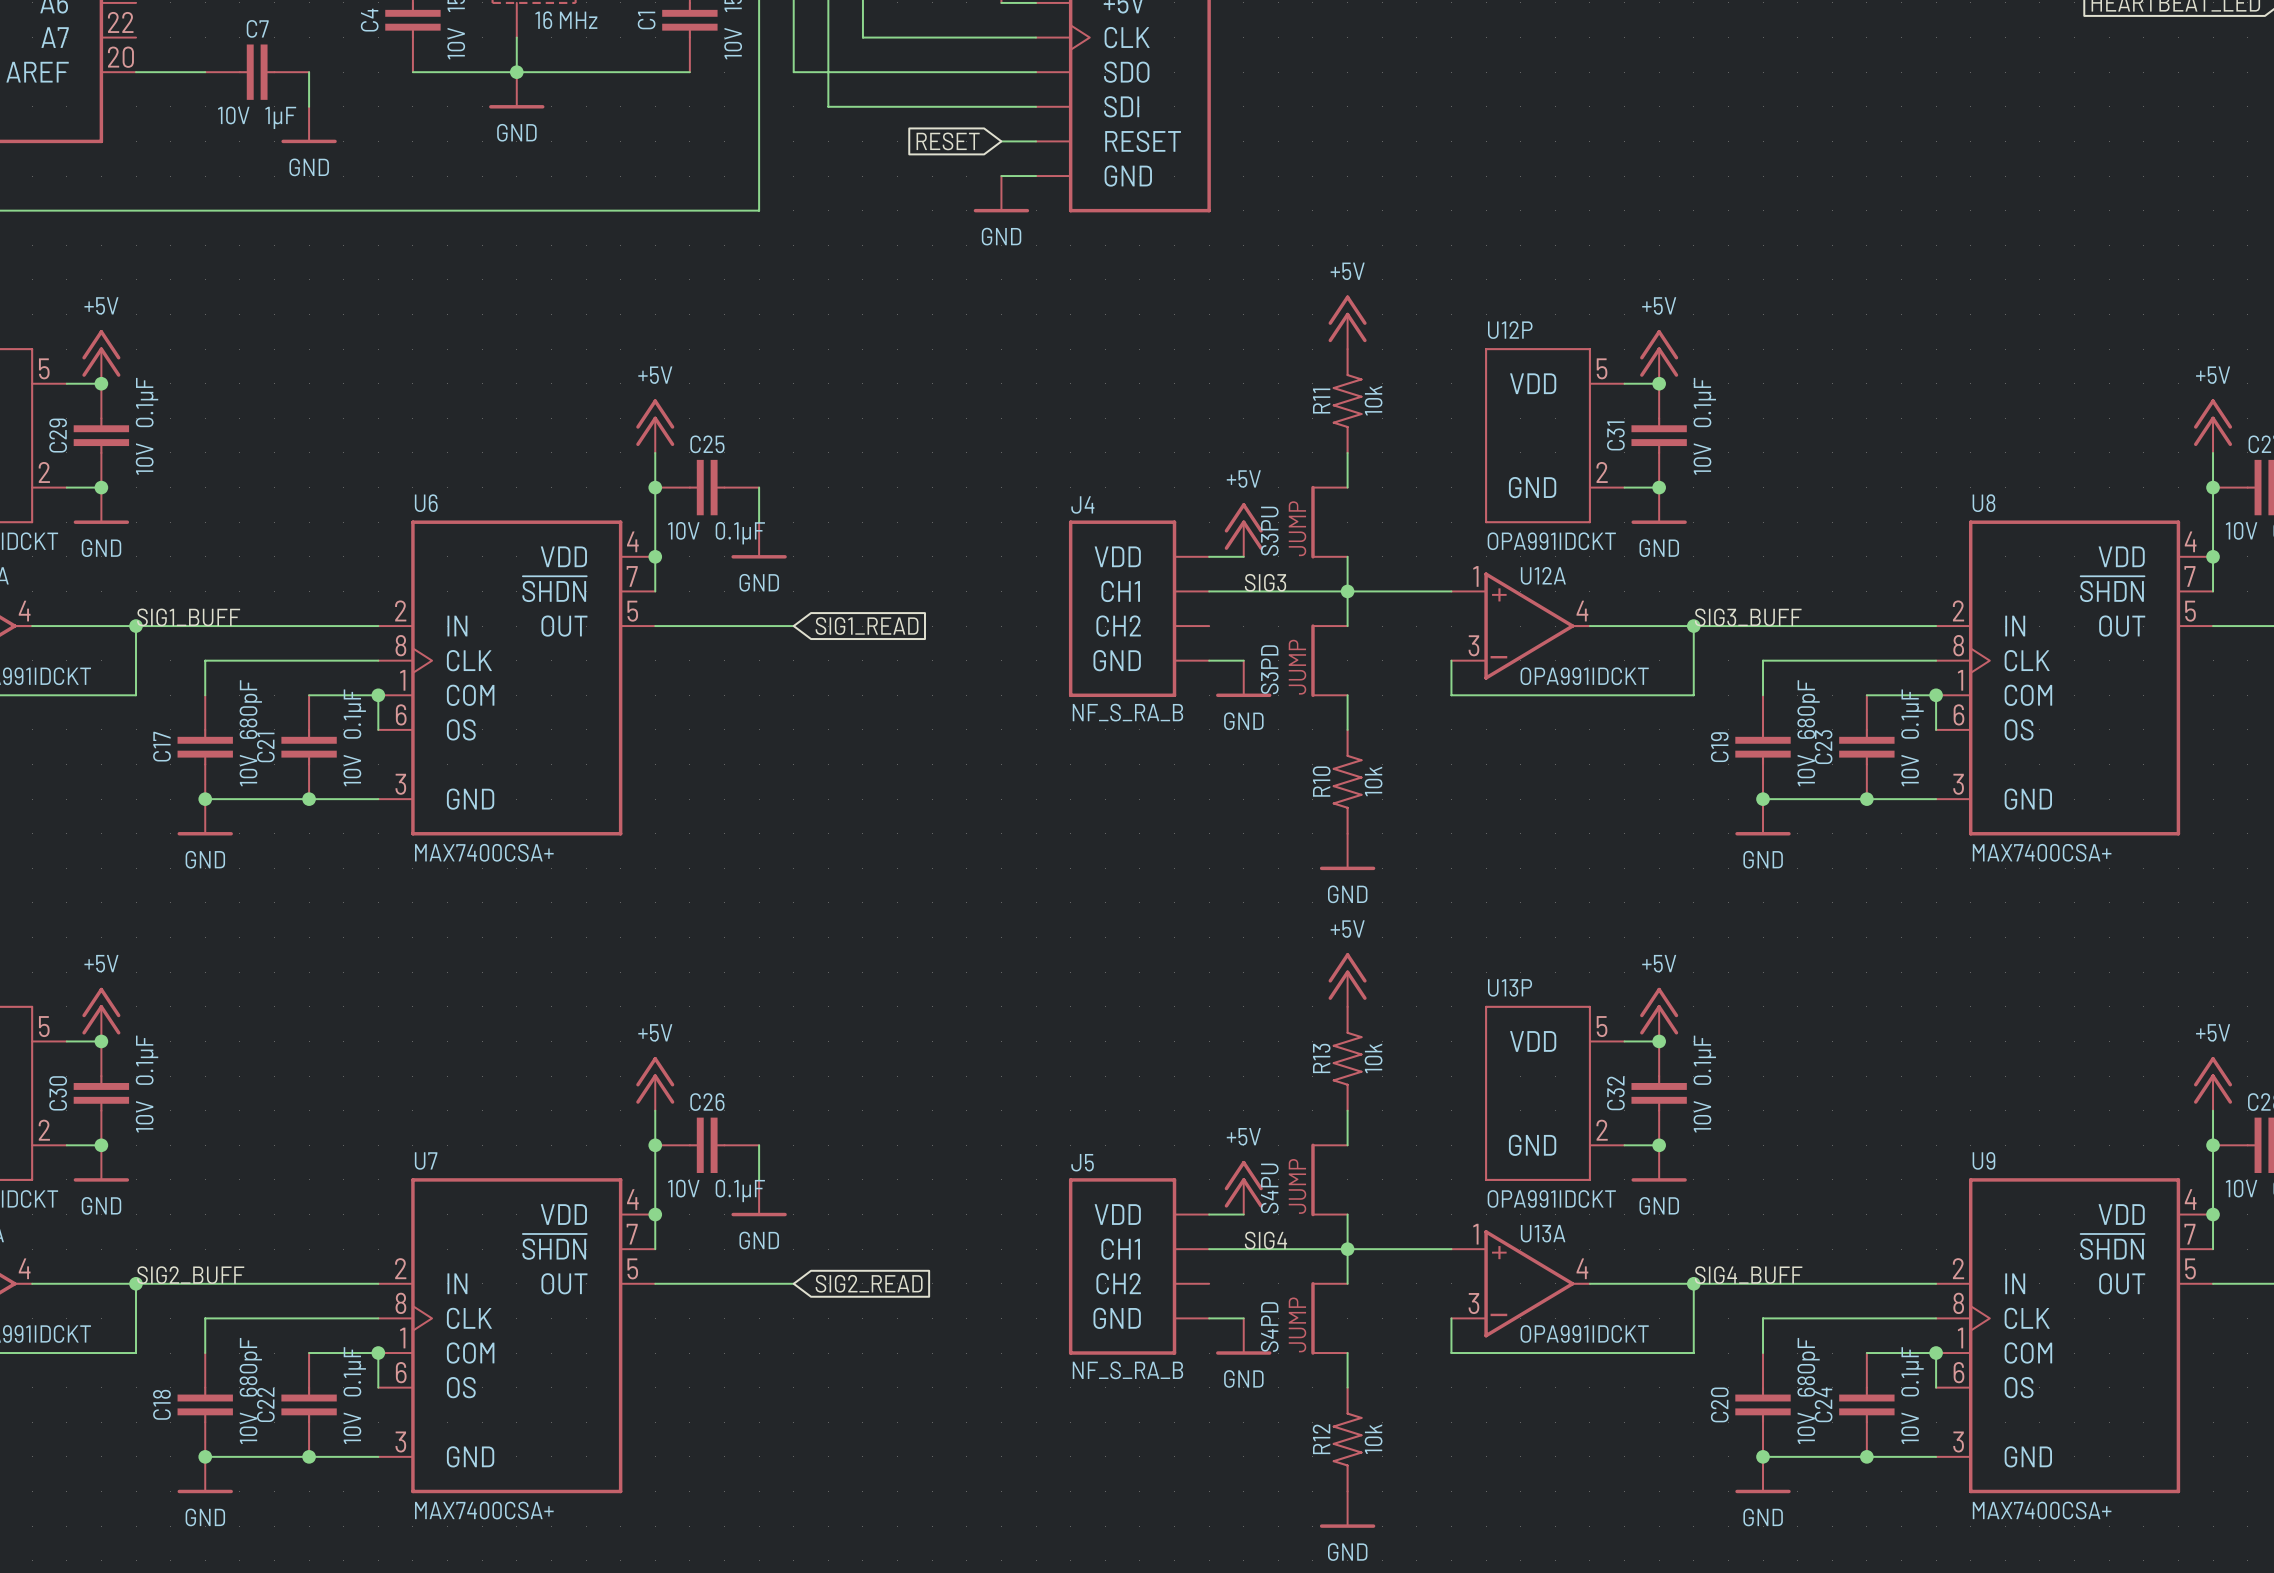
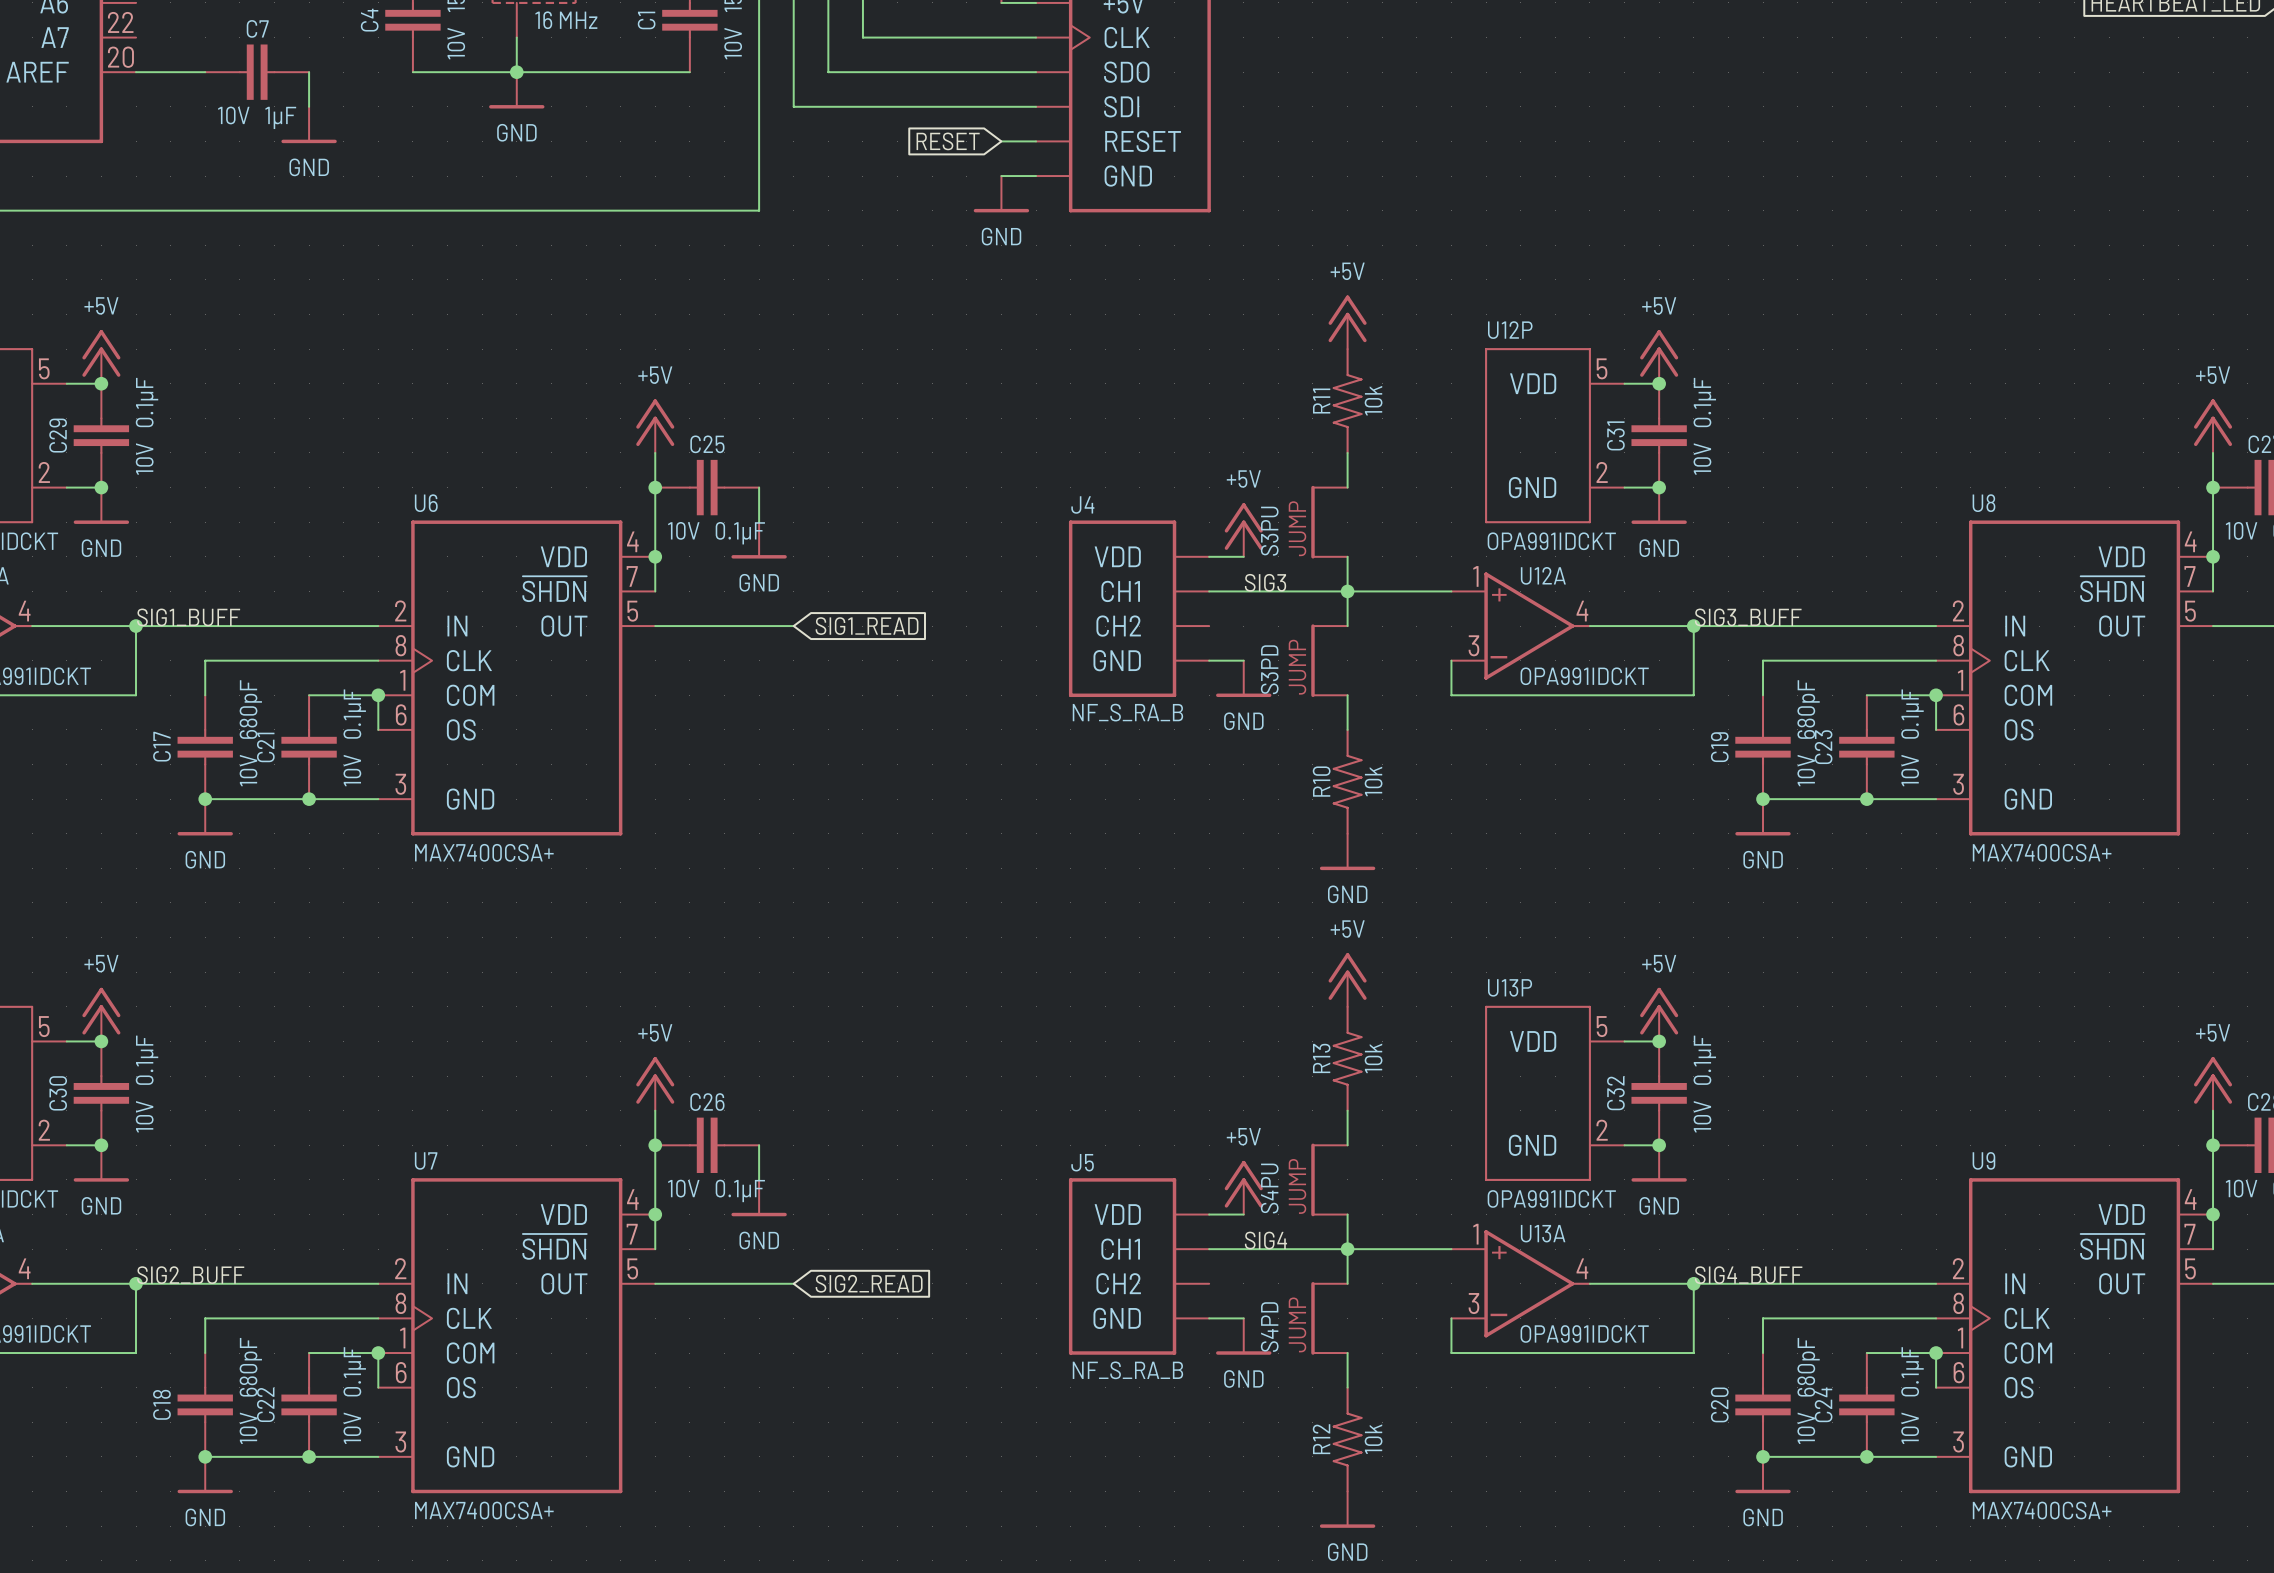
wire: (793, 72) (828, 72) (828, 106) -> (793, 72) (793, 106) (828, 106)

